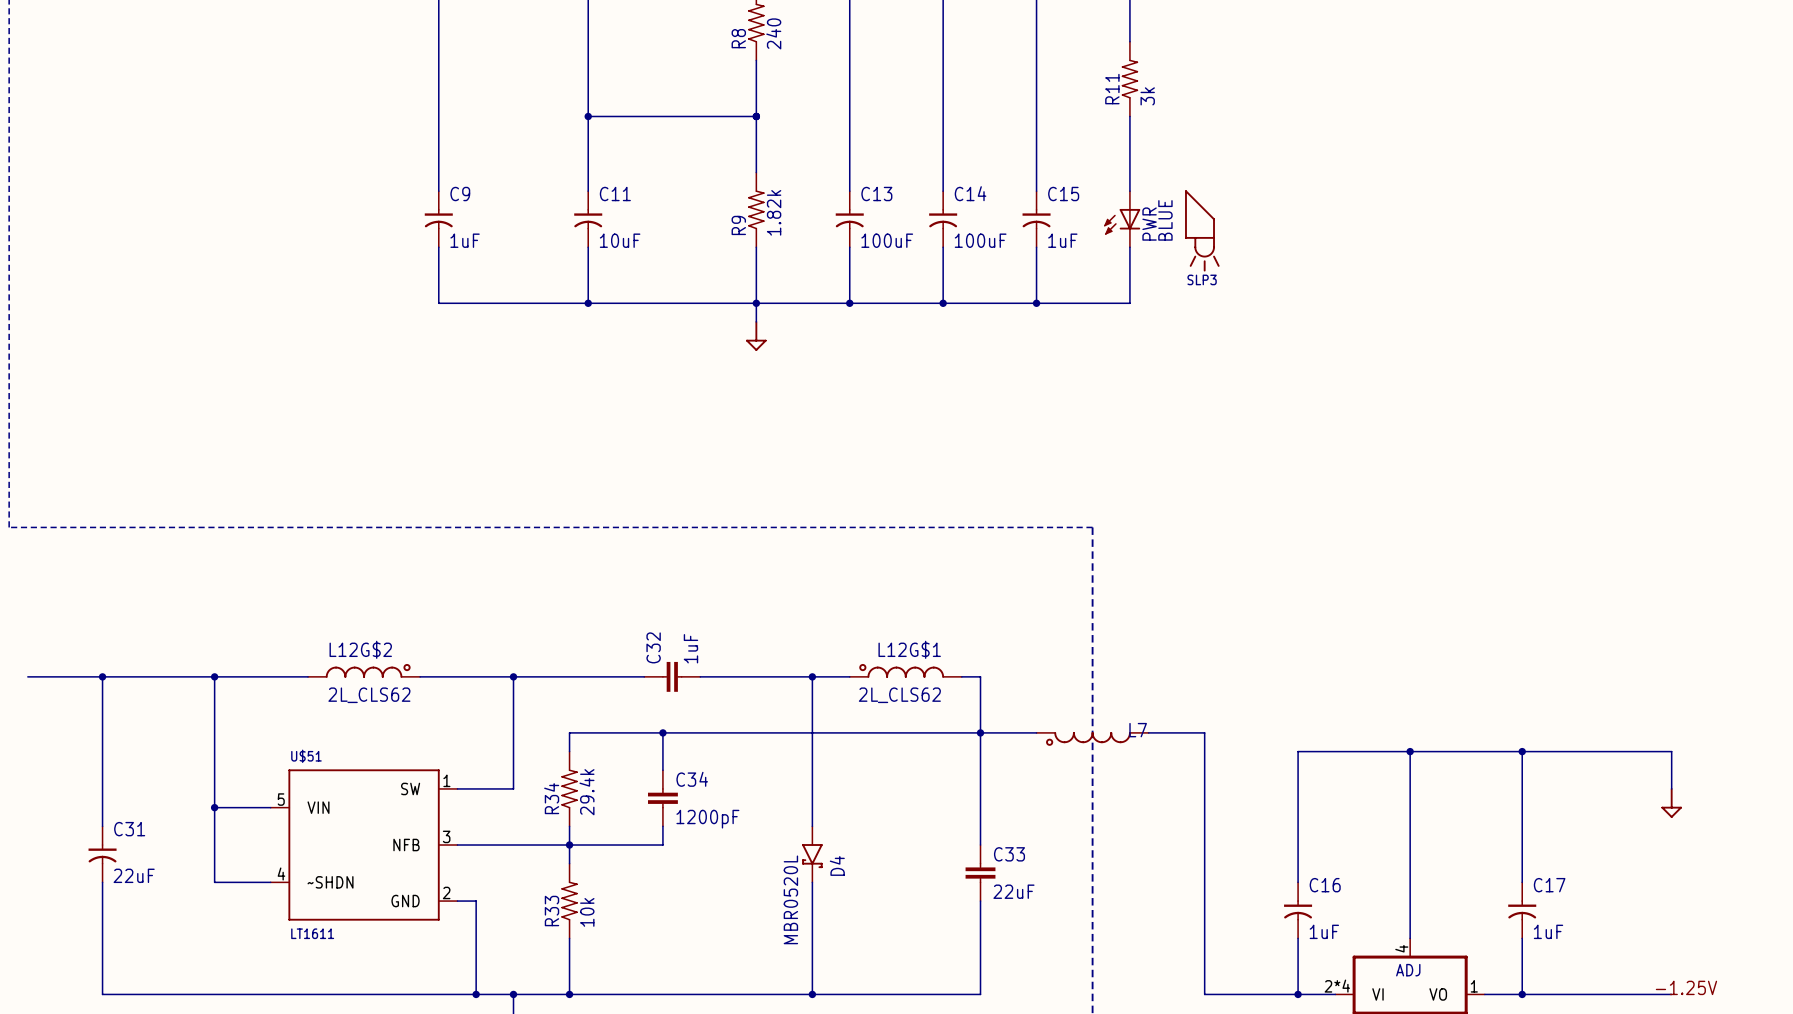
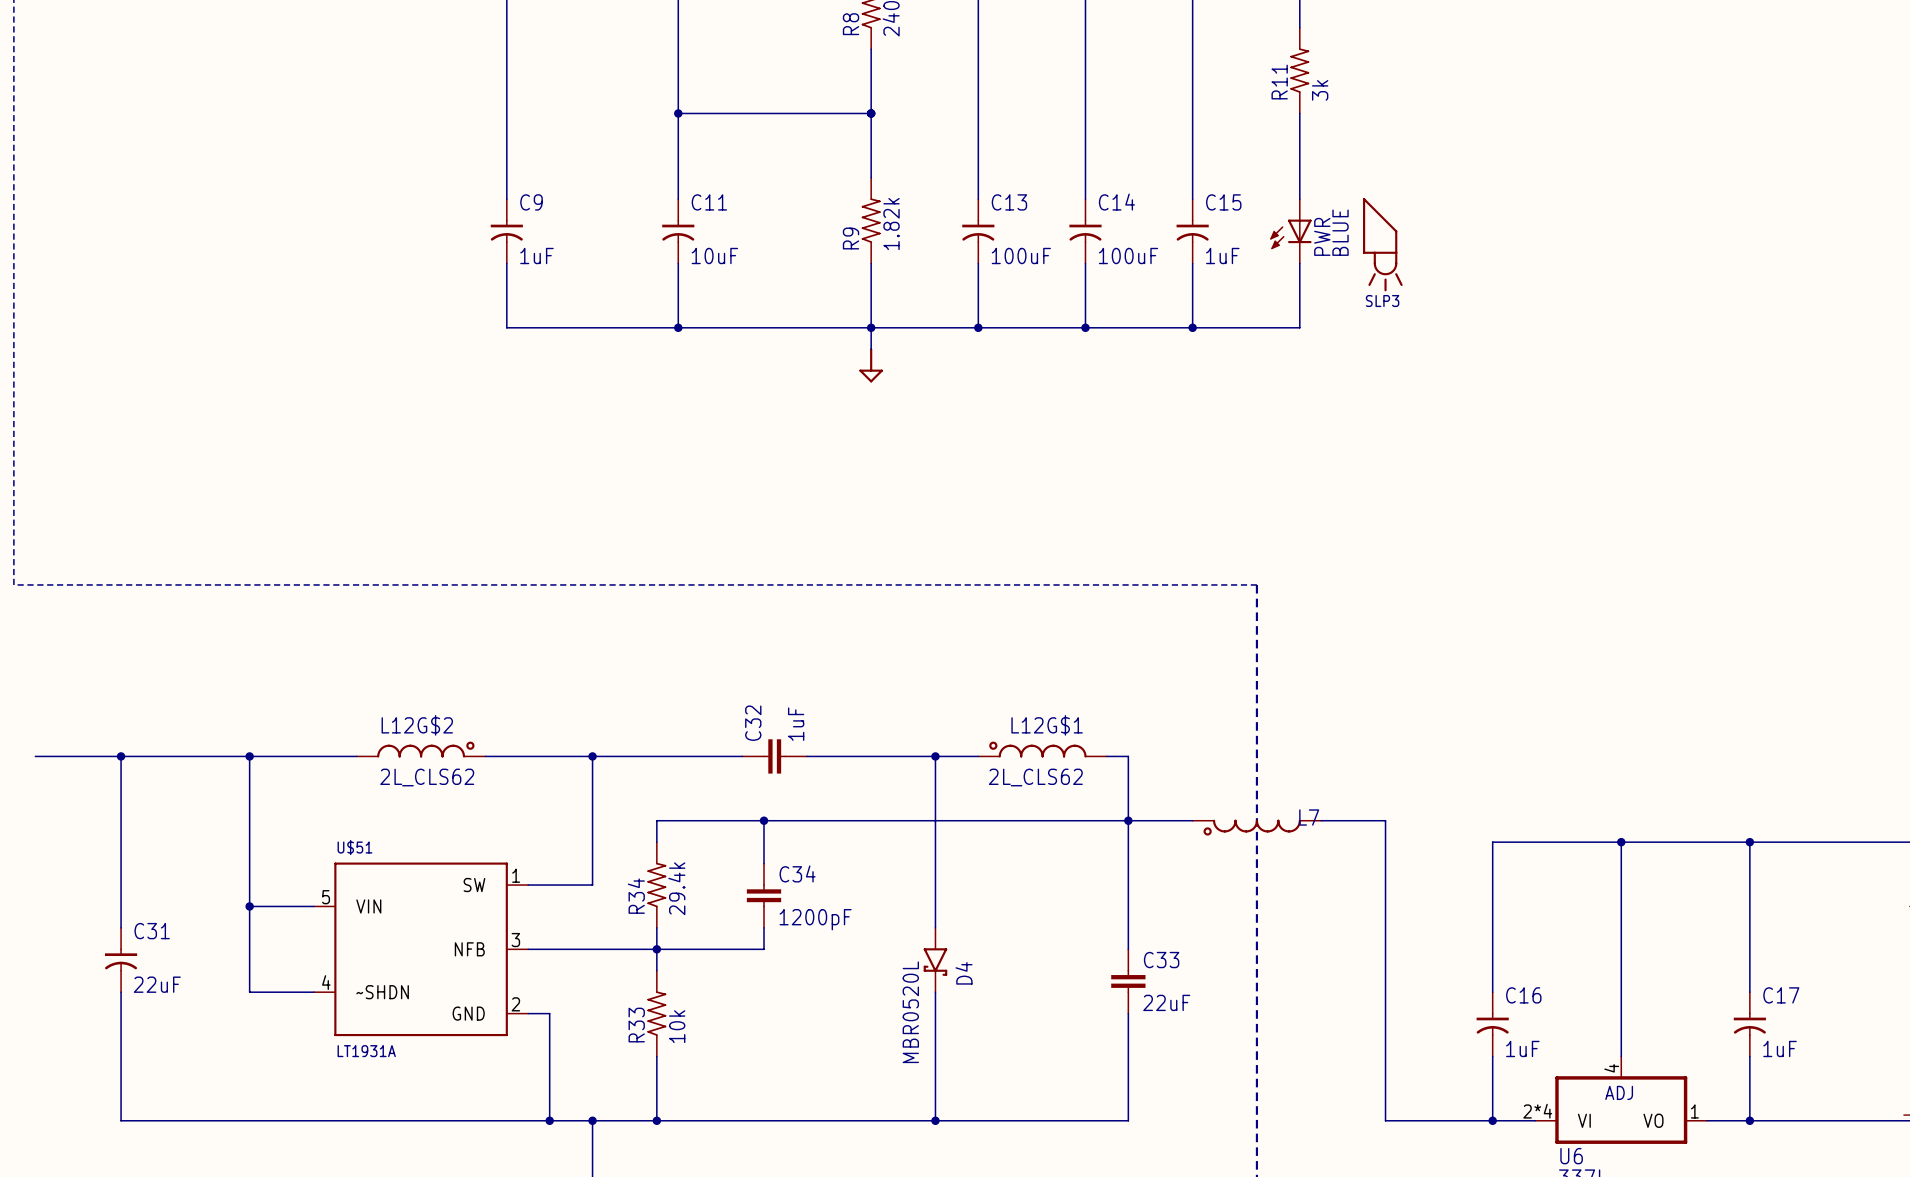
U$51 value: LT1611 (312, 933) -> LT1931A (366, 1051)

